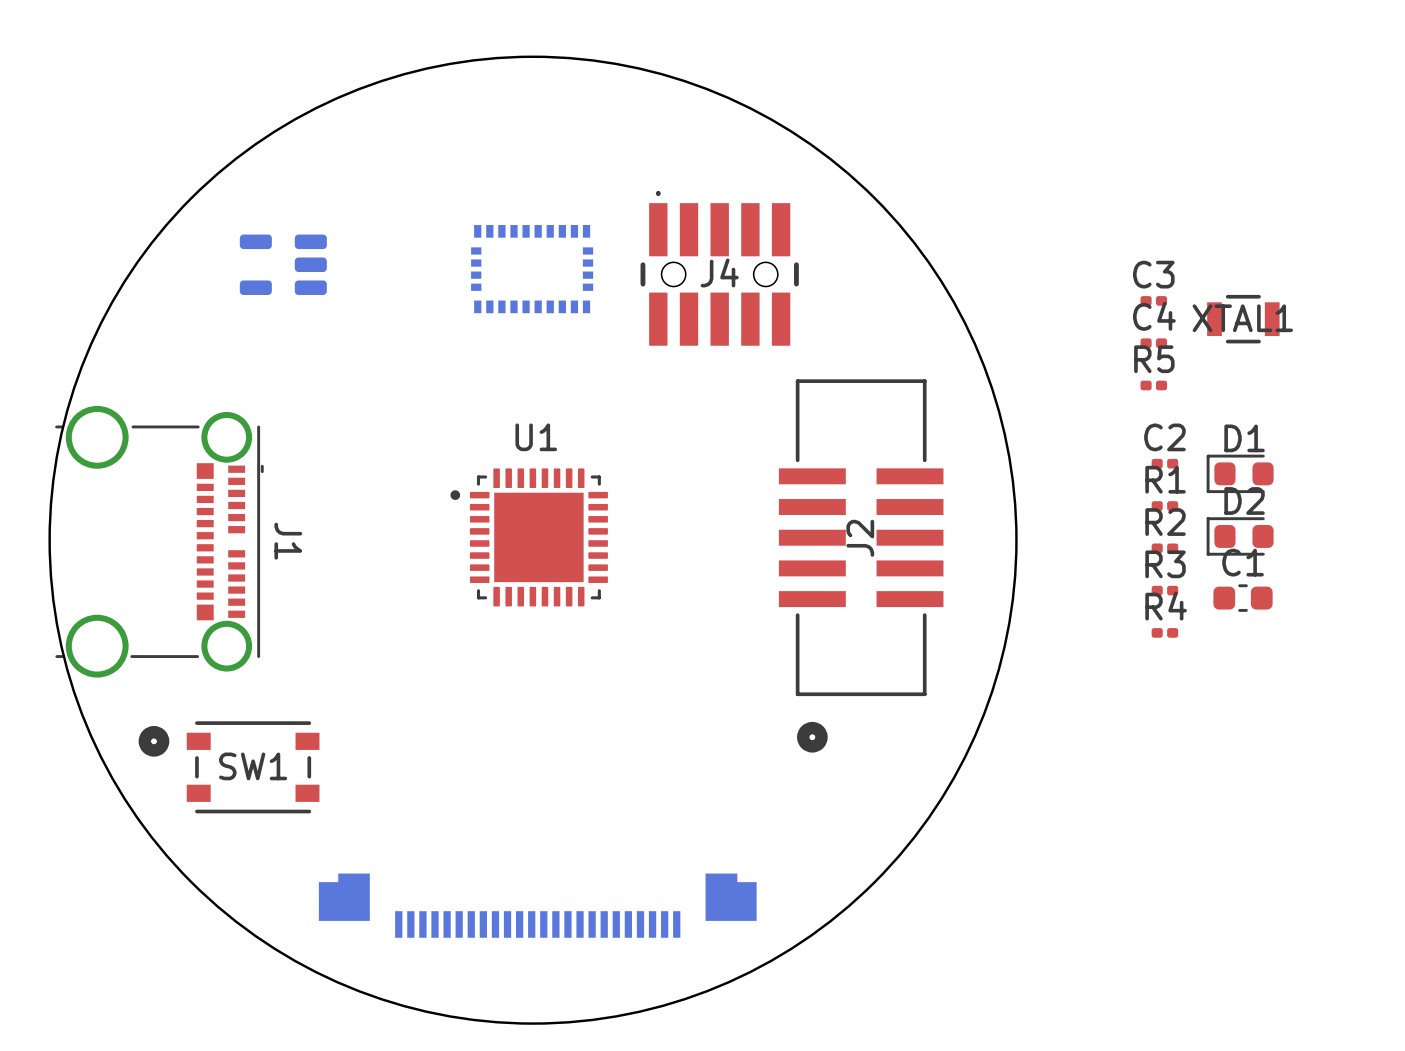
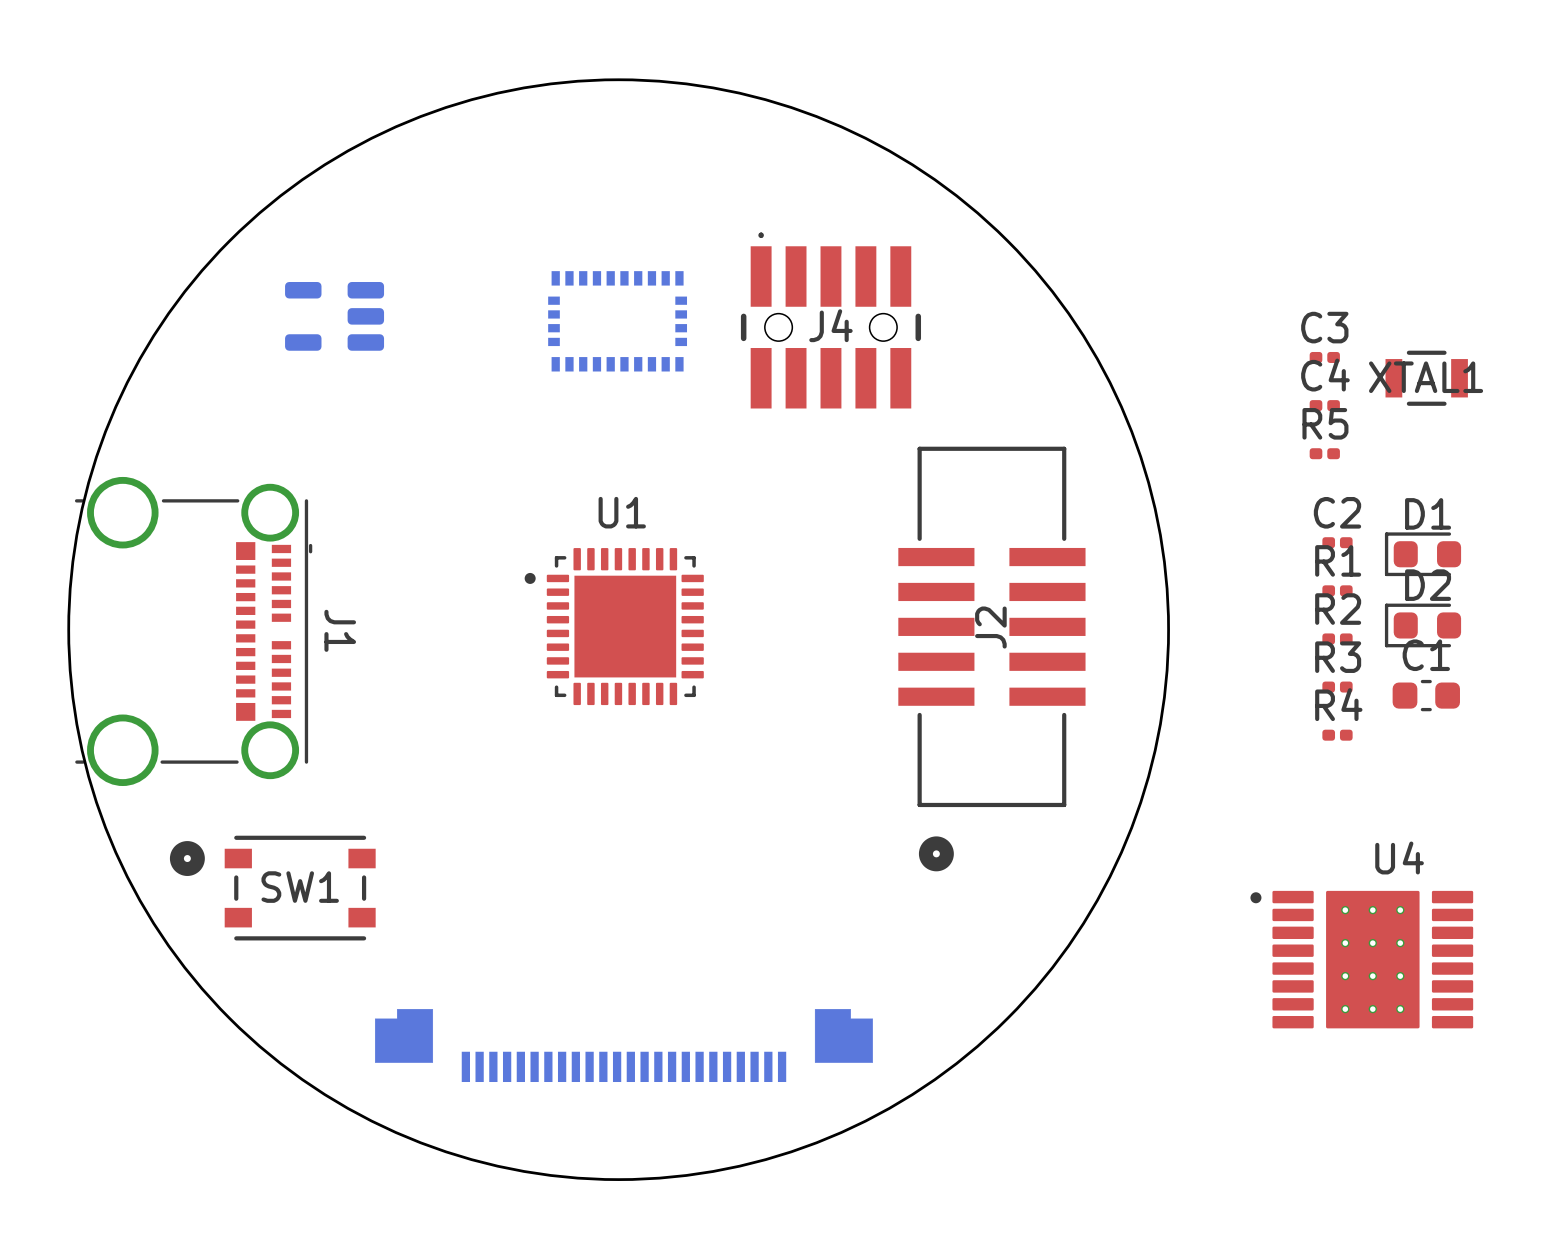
U4: none -> (1361, 959)

